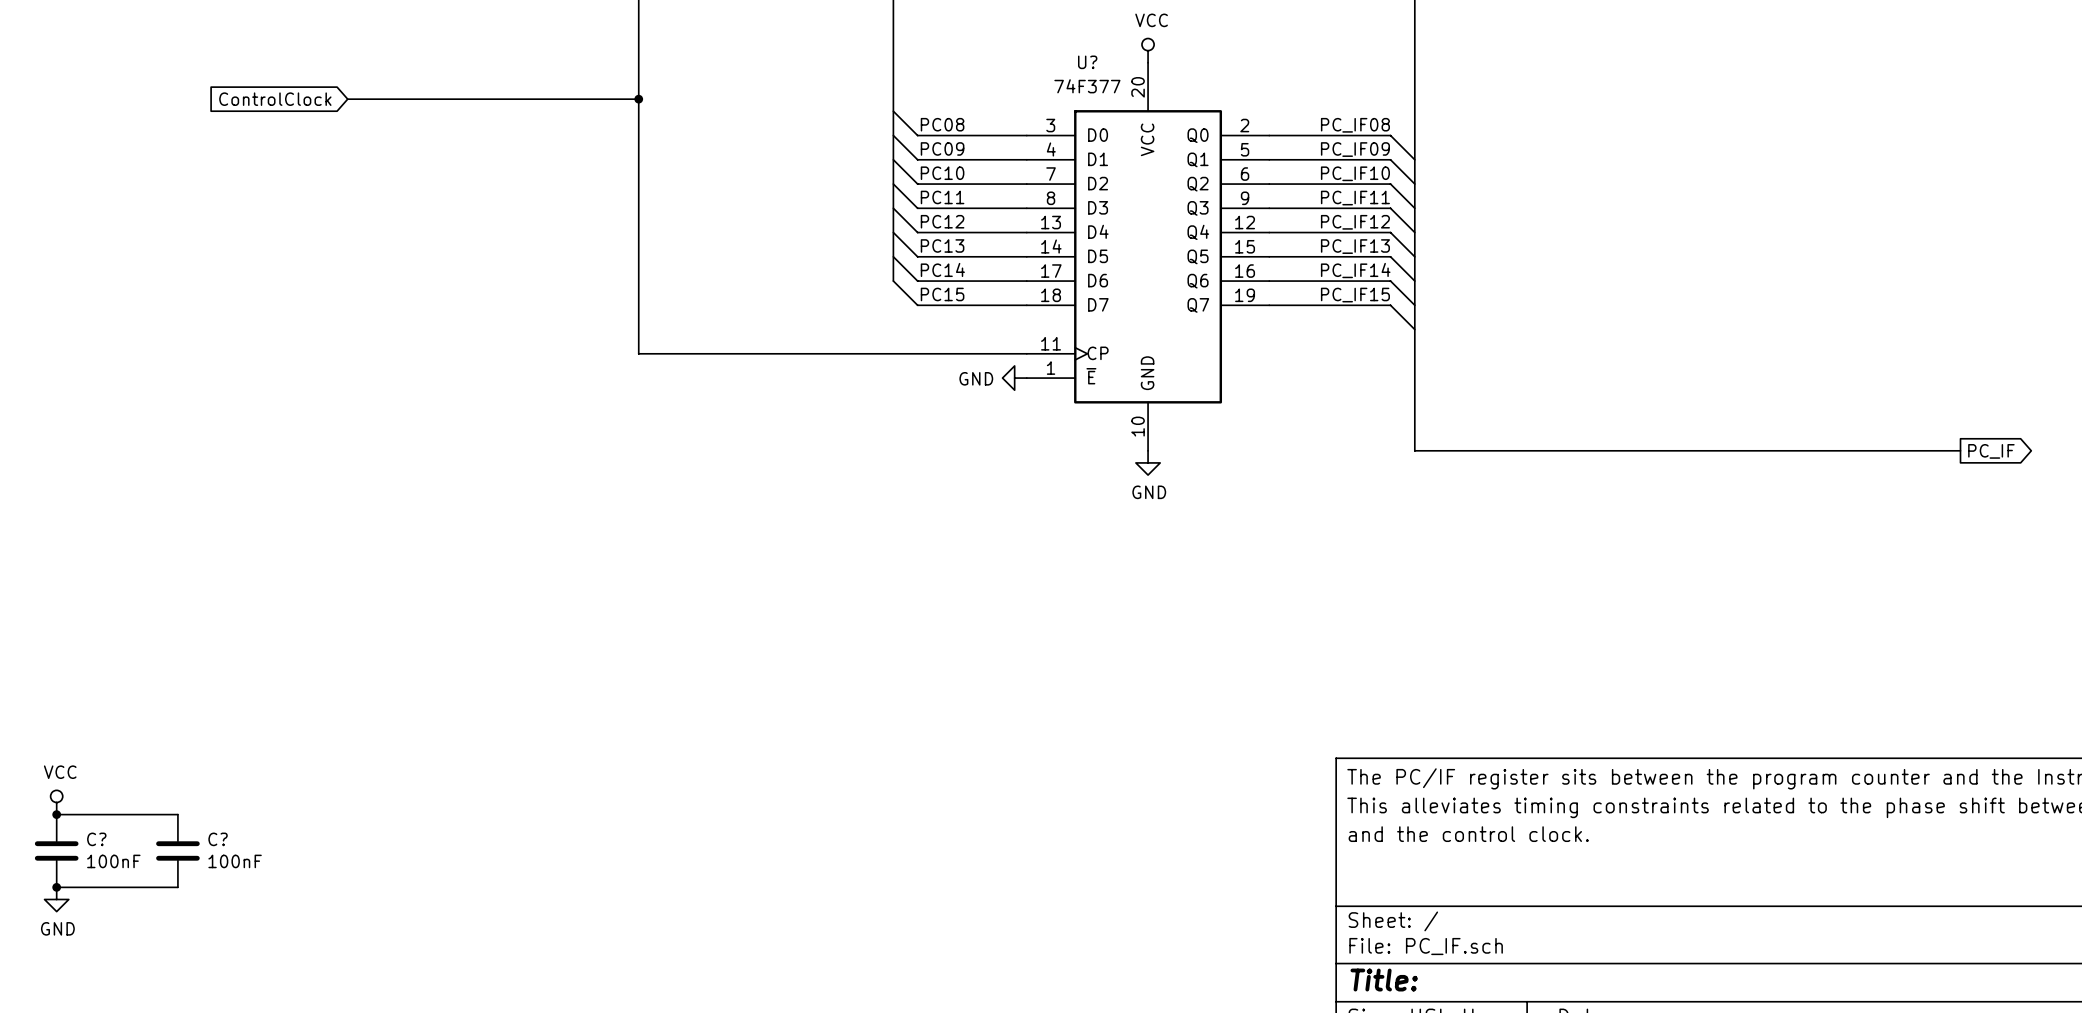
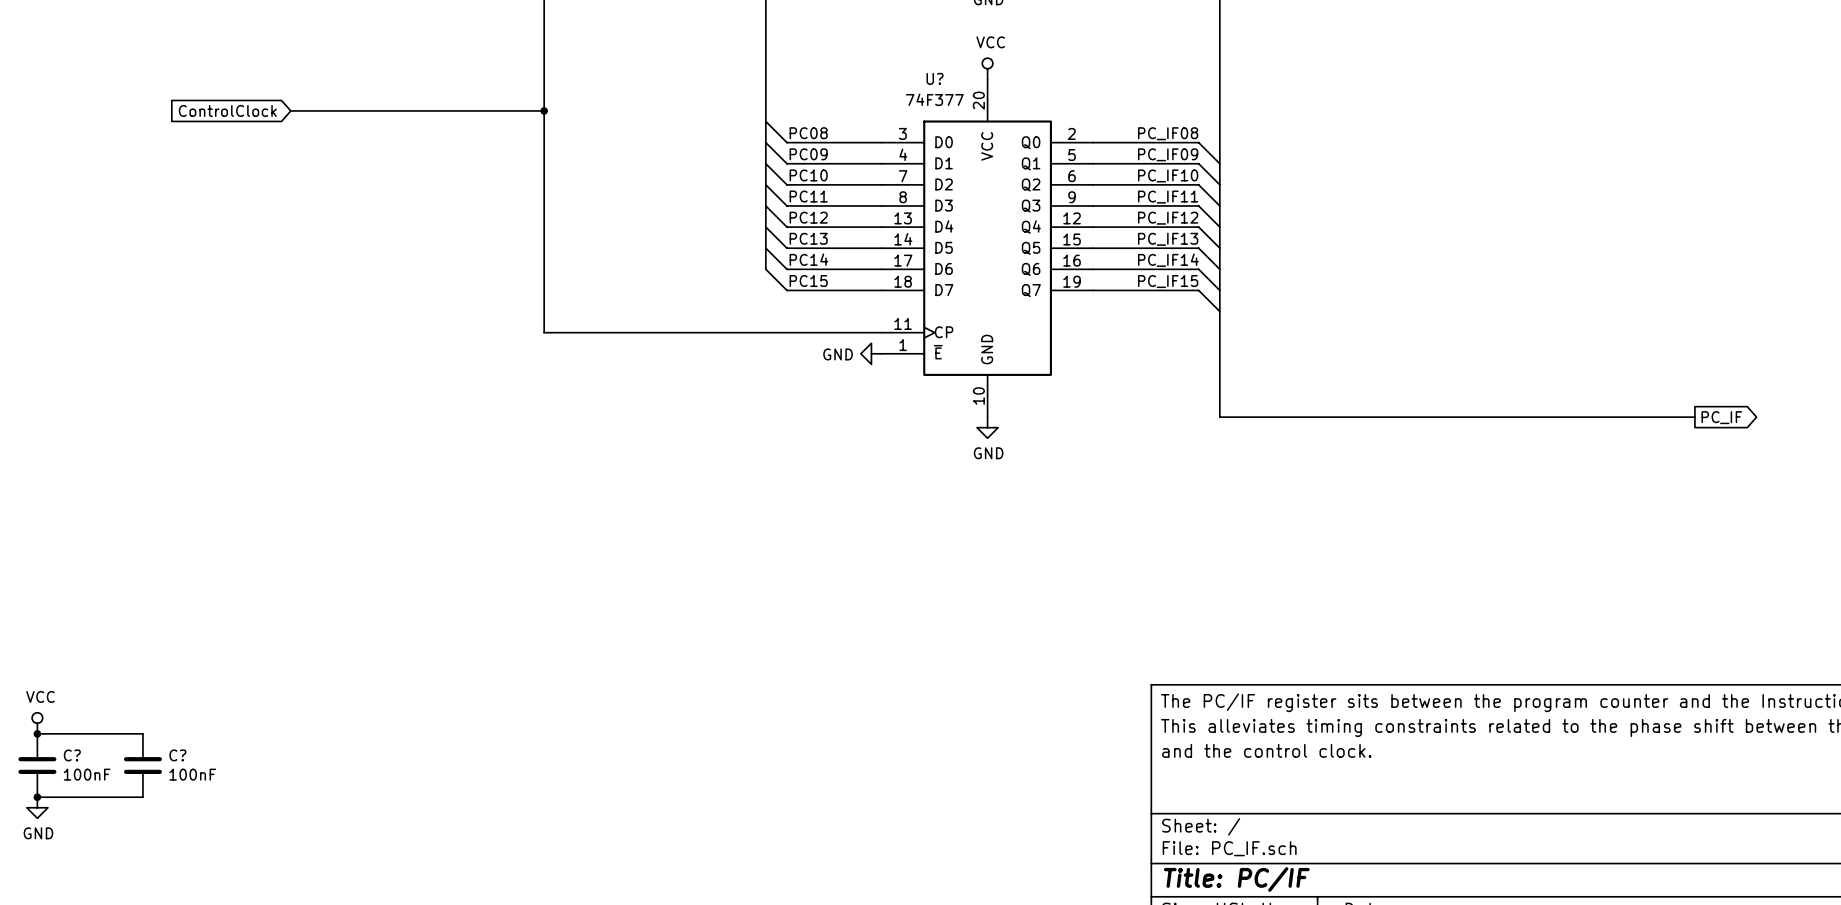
title block: Title: (1384, 980) -> Title: PC/IF (1236, 879)

